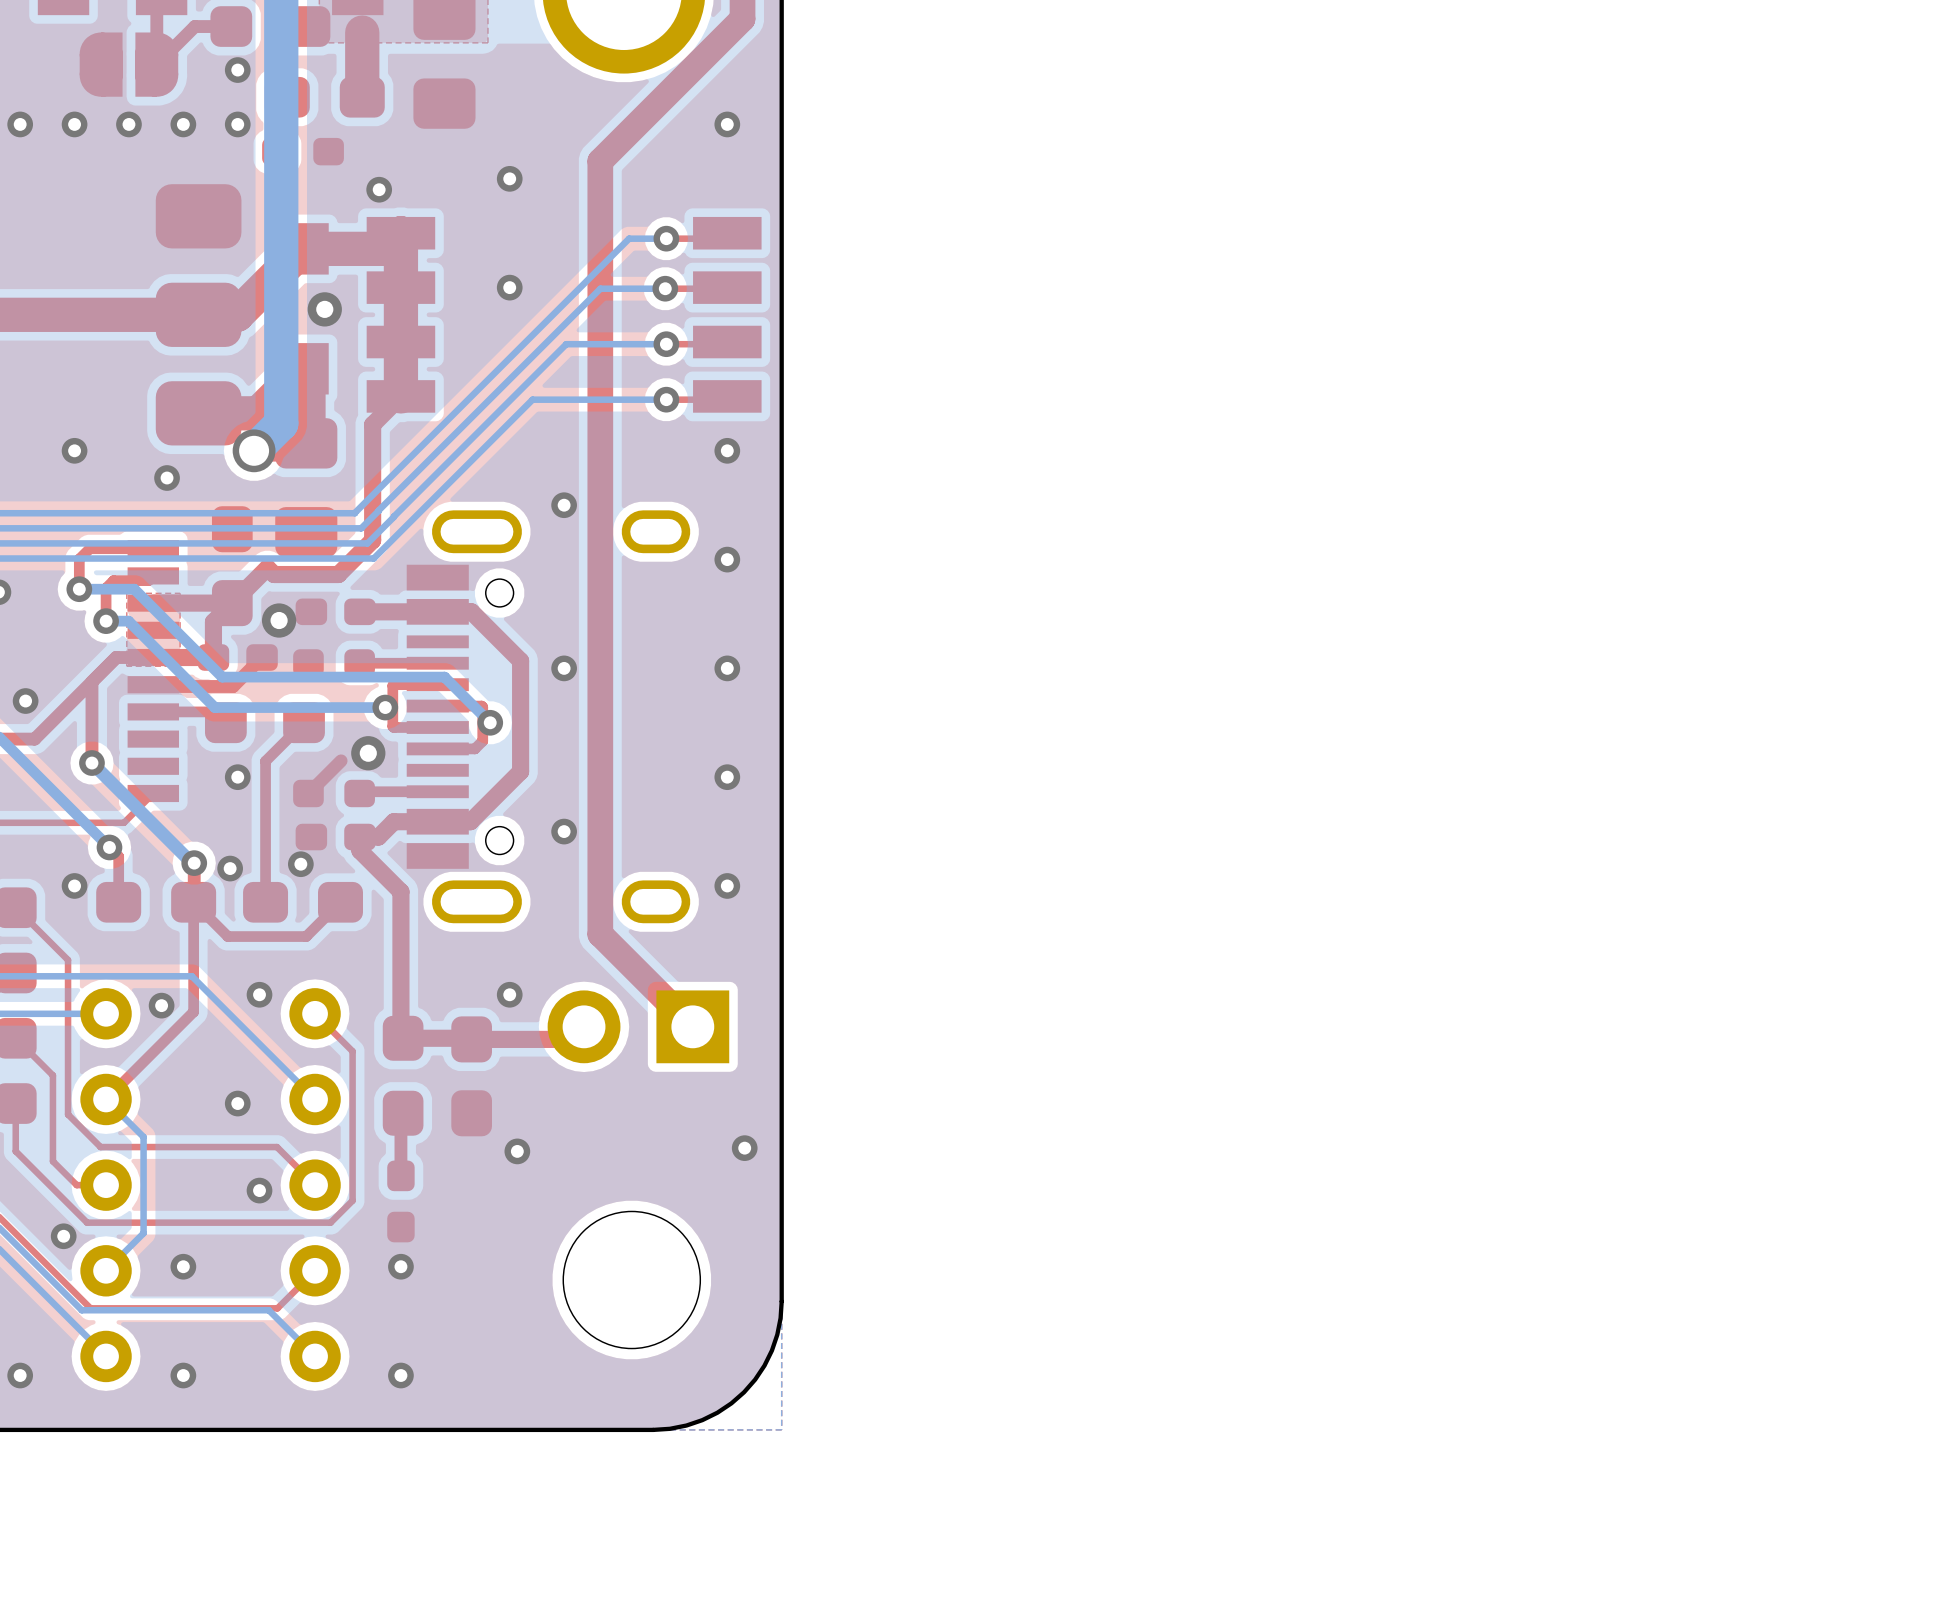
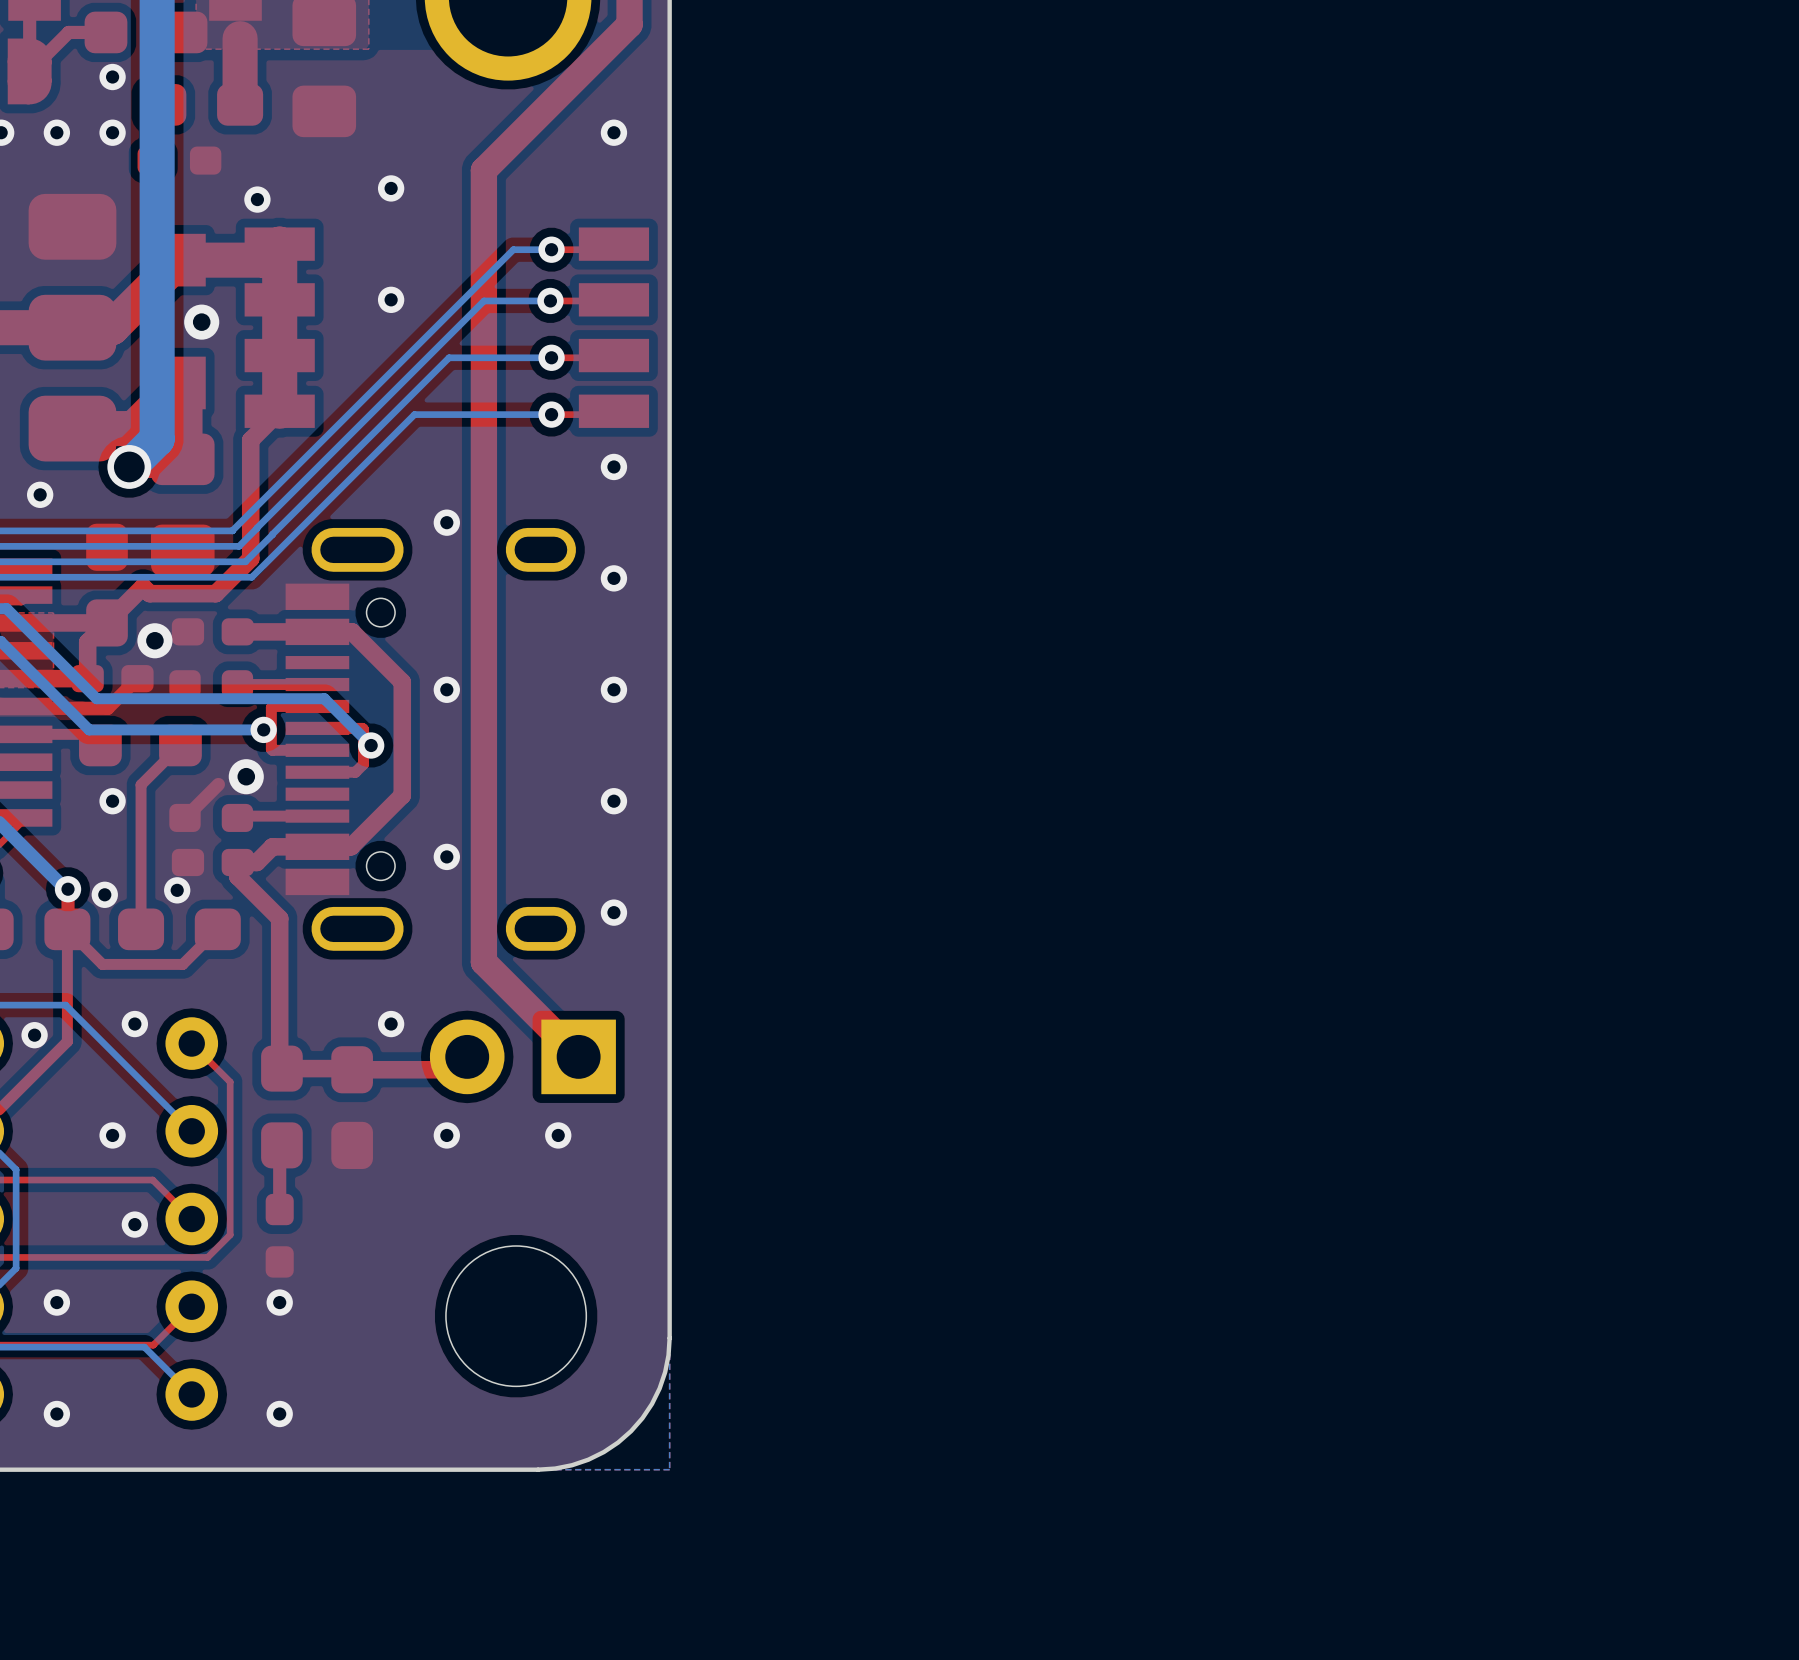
via: none -> (558, 1135)
via: (744, 1148) -> none
via position: (517, 1151) -> (446, 1135)

